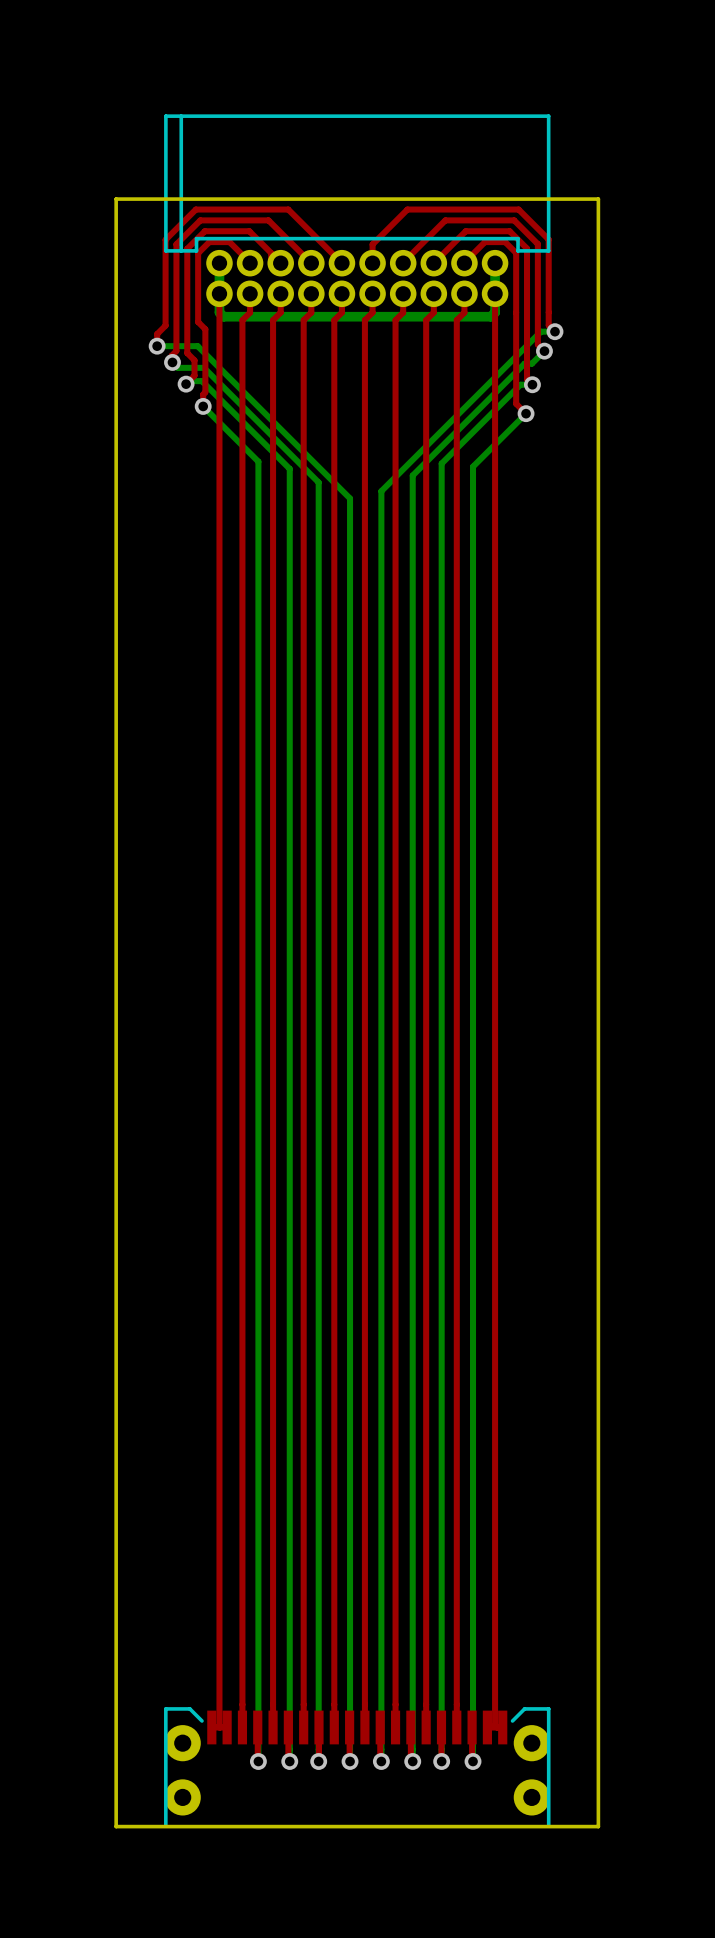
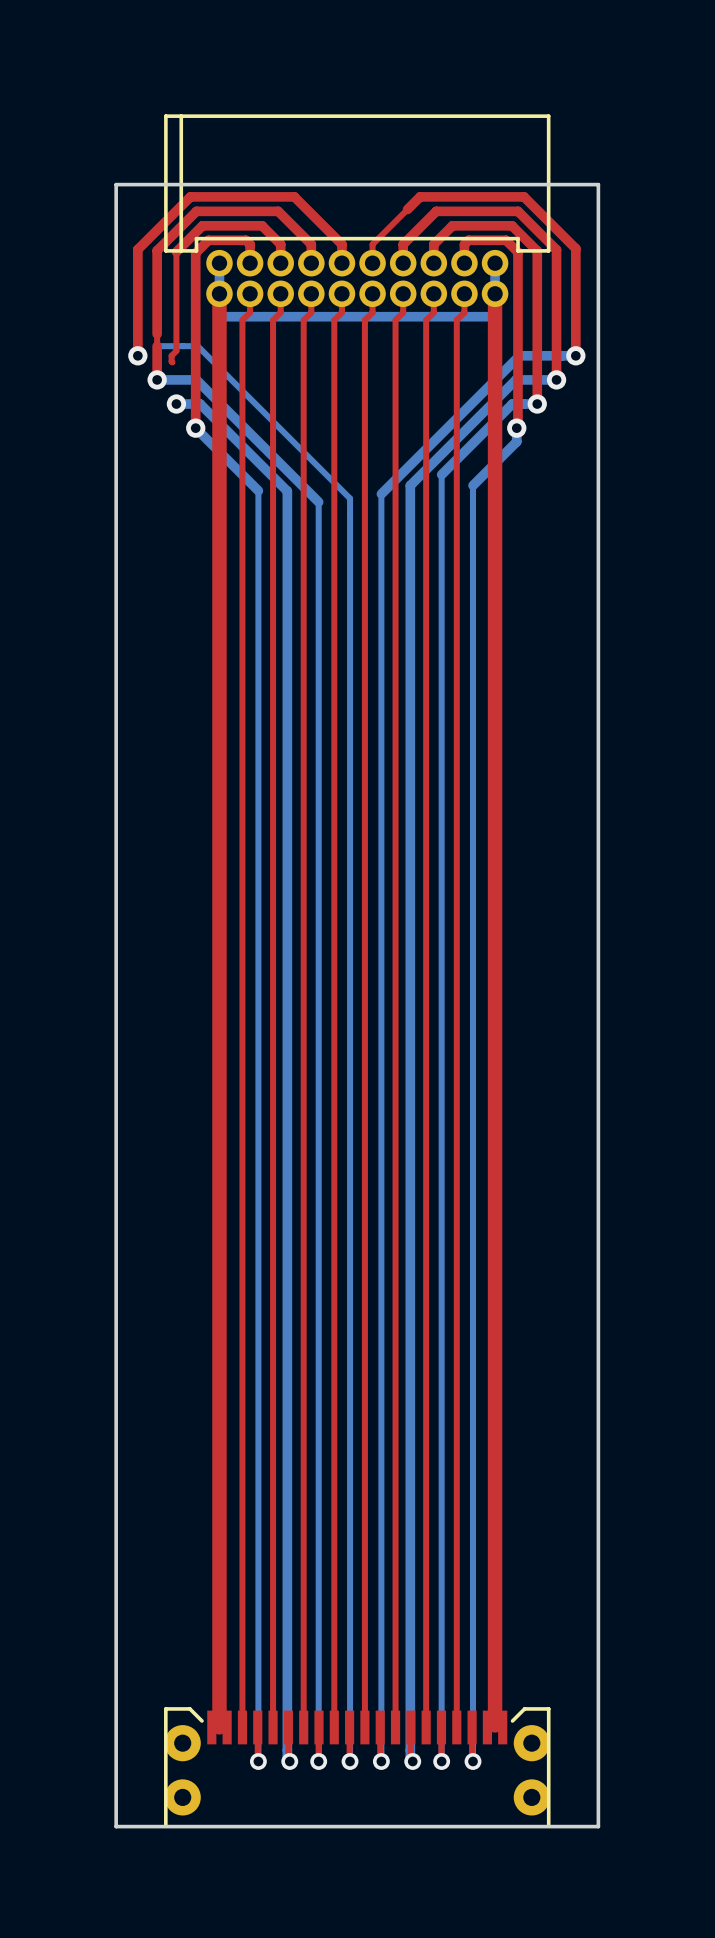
board edge: (116, 199) (598, 199) -> (116, 199) (116, 184) (598, 184) (598, 199)
top track: (407, 209) (518, 209) (548, 239) (548, 325) (554, 331) -> (407, 209) (420, 196) (524, 196) (575, 248) (575, 355)
top track: (176, 251) (176, 244) (200, 220) (268, 220) (311, 263) -> (176, 251) (202, 225) (262, 225) (280, 244) (280, 263)
top track: (250, 262) (229, 242) (209, 242) (198, 253) (198, 322) (205, 329) (205, 392) (203, 394) (203, 406) -> (250, 263) (250, 244) (245, 240) (208, 240) (195, 253) (195, 428)
top track: (403, 262) (445, 220) (514, 220) (537, 244) (537, 344) (544, 351) -> (403, 263) (403, 244) (436, 211) (518, 211) (556, 249) (556, 379)
top track: (464, 262) (484, 242) (505, 242) (516, 253) (516, 403) (526, 413) -> (464, 263) (464, 244) (468, 240) (506, 240) (517, 252) (516, 428)
top track: (280, 263) (274, 263) (271, 260) (271, 253) (249, 231) (204, 231) (187, 248) (187, 353) (194, 360) (194, 375) (186, 384) -> none
top track: none -> (311, 263) (311, 244) (278, 211) (196, 211) (157, 250) (157, 334)
top track: (341, 263) (288, 209) (195, 209) (165, 239) (165, 325) (157, 334) -> (341, 263) (341, 244) (294, 196) (190, 196) (137, 249) (137, 355)
top track: (433, 263) (465, 231) (509, 231) (527, 248) (527, 379) (532, 384) -> (433, 263) (433, 244) (452, 225) (512, 225) (537, 251) (537, 404)
top track width: thin (219, 293) (219, 1727) -> thick (219, 293) (219, 1727)
top track width: thin (495, 293) (495, 1725) -> thick (495, 293) (495, 1725)
bottom track: (554, 331) (540, 331) (381, 491) (381, 494) -> (575, 355) (519, 355) (381, 494)
via: (554, 331) -> none
top track: none -> (157, 346) (157, 379)
via: (157, 346) -> none
bottom track: (544, 351) (531, 363) (524, 363) (412, 475) (412, 1761) -> none
via: (544, 351) -> none
via: none -> (137, 355)
via: none -> (575, 355)
bottom track: (172, 362) (177, 367) (204, 367) (318, 482) (318, 502) -> (157, 379) (196, 379) (318, 502)
via position: (172, 362) -> (157, 379)
bottom track: none -> (556, 379) (515, 379) (410, 485) (410, 1763)
via: none -> (556, 379)
bottom track: (186, 384) (189, 381) (201, 381) (289, 468) (289, 1761) -> none
via: (186, 384) -> none
bottom track: (532, 384) (520, 384) (441, 463) (441, 474) -> (537, 404) (512, 404) (441, 474)
via: (532, 384) -> none
bottom track: none -> (176, 404) (200, 404) (287, 491) (287, 1763)
via: none -> (176, 404)
via: none -> (537, 404)
bottom track: (203, 406) (258, 461) (258, 490) -> (195, 428) (258, 490)
via: (203, 406) -> none
bottom track: (526, 413) (473, 466) (473, 485) -> (516, 428) (516, 441) (473, 485)
via: (526, 413) -> none
via: none -> (195, 428)
via: none -> (516, 428)

